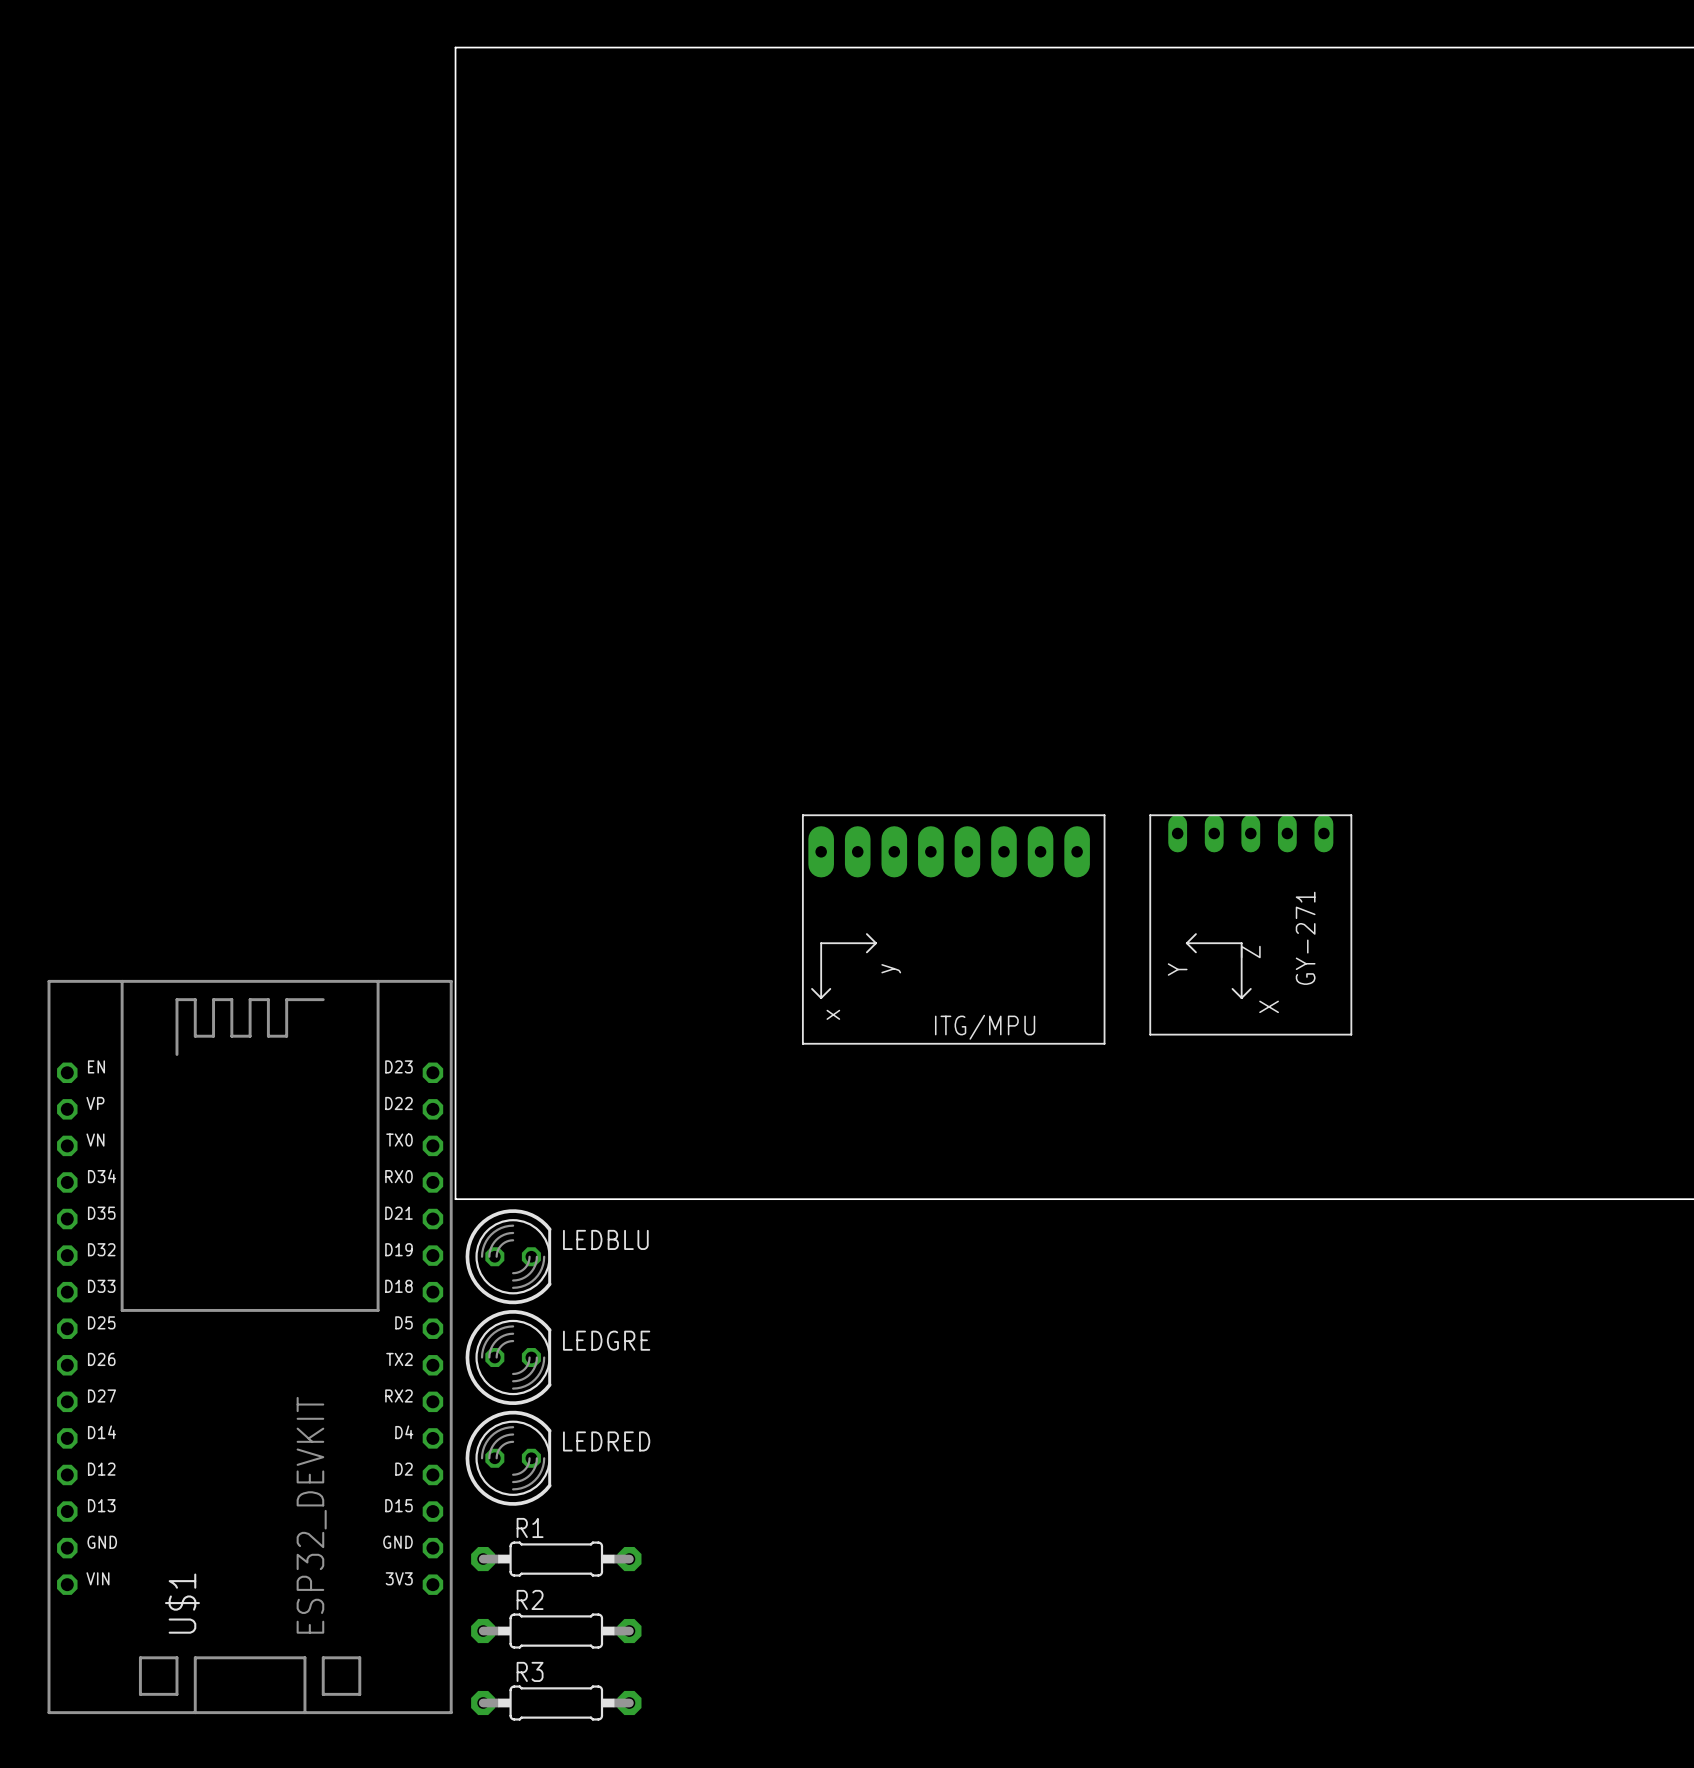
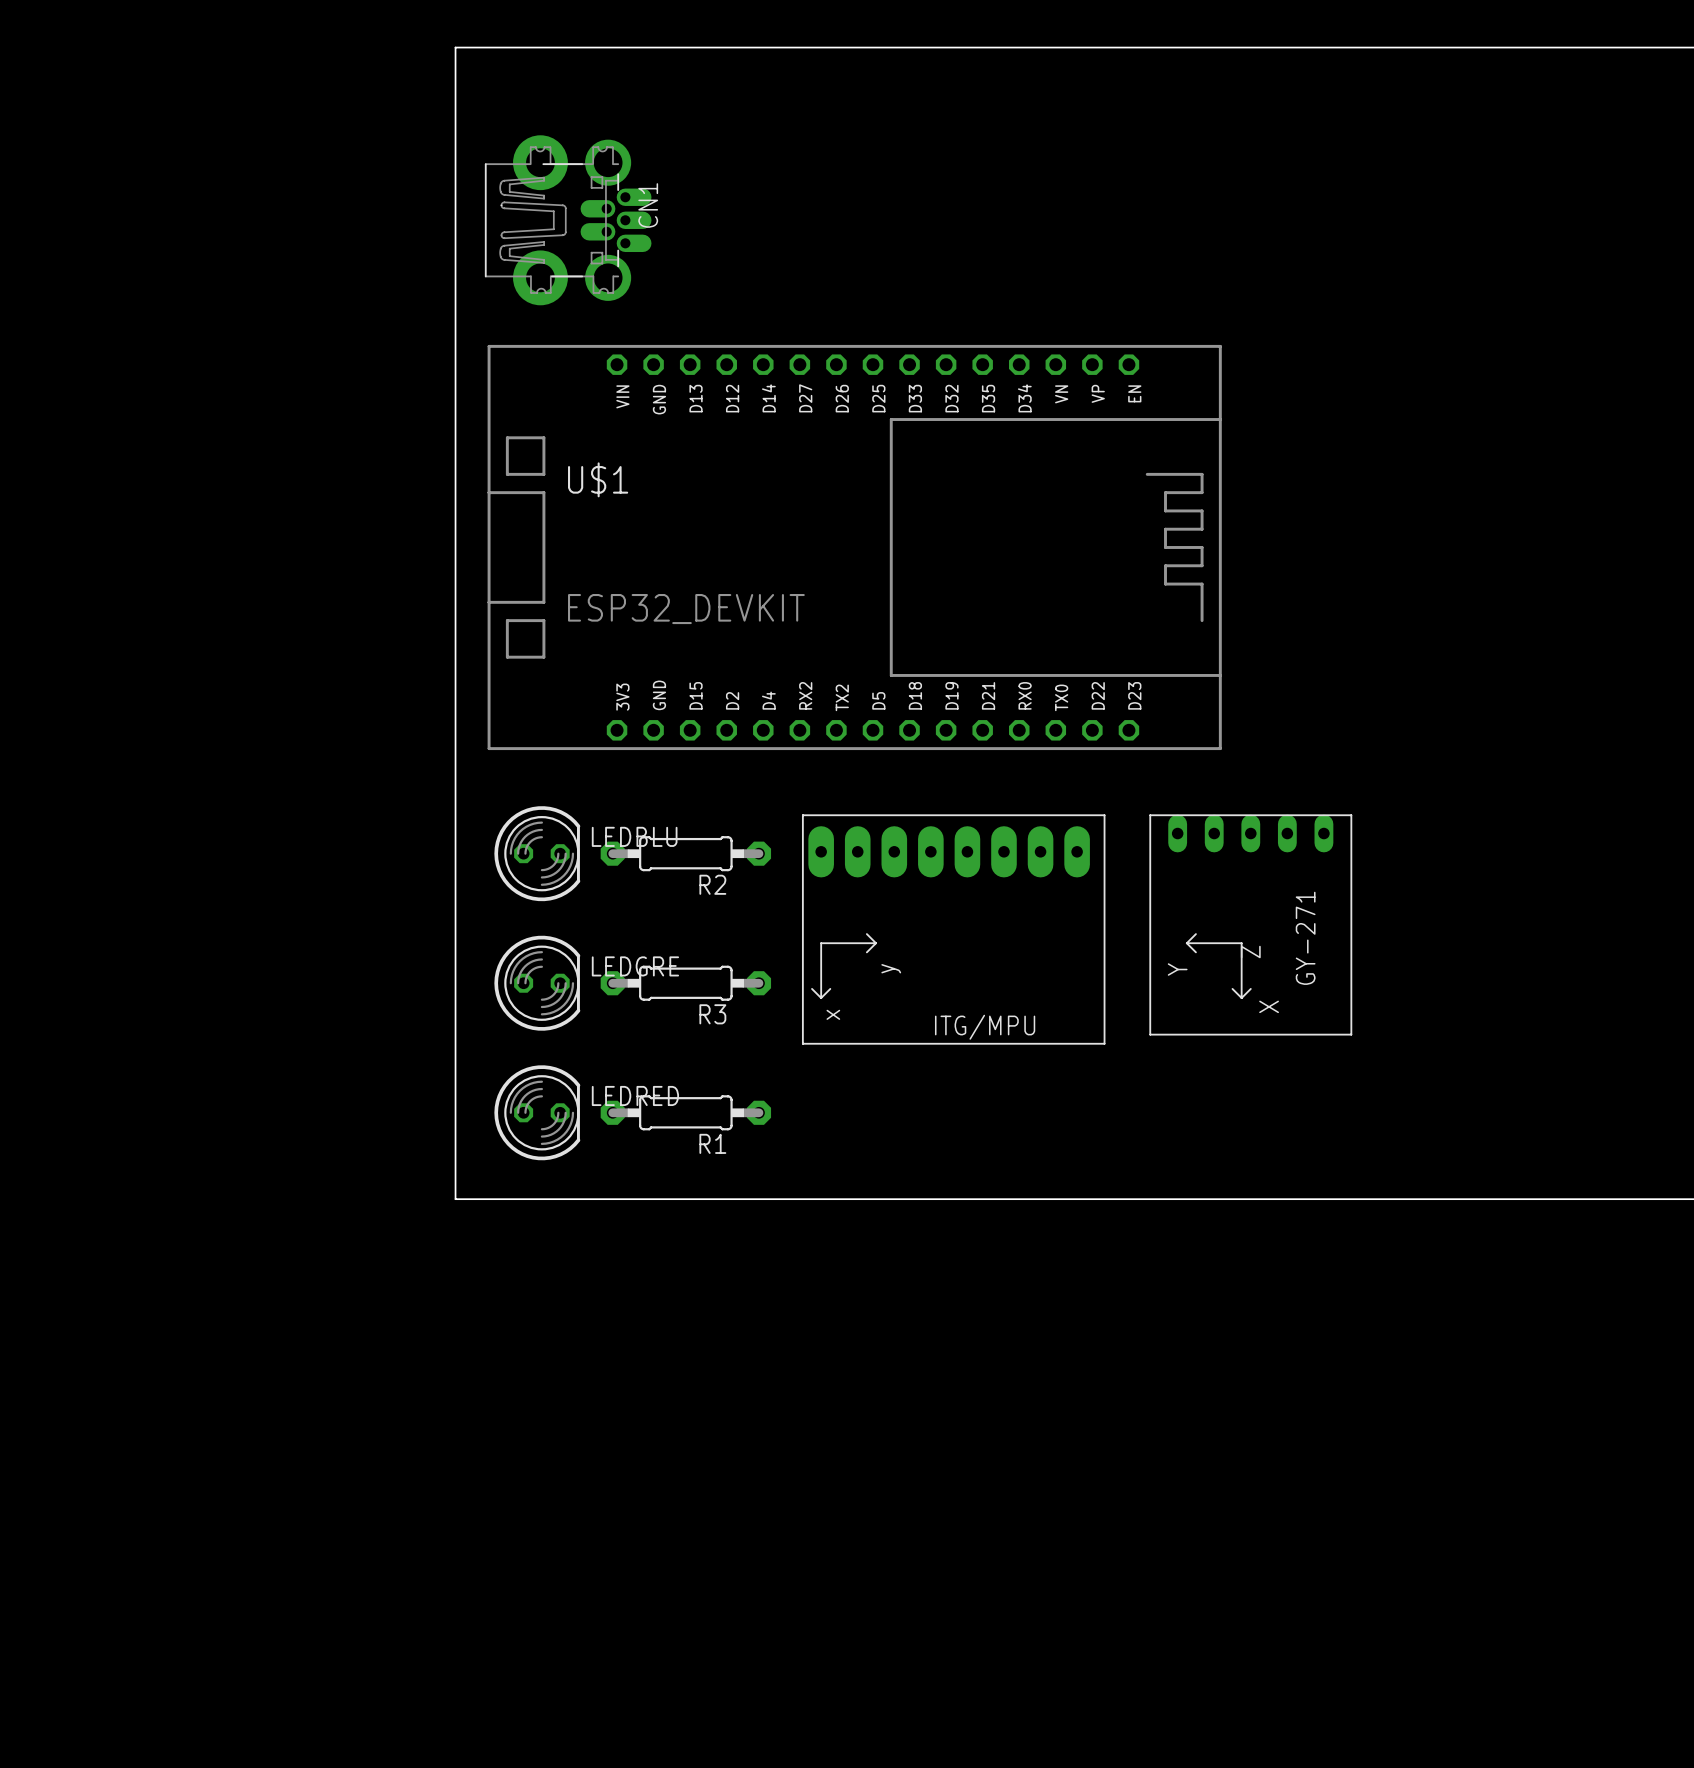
CN1: none -> (568, 220)
LEDBLU: none -> (537, 853)
U$1 footprint: [47, 979, 453, 1715] -> [487, 344, 1222, 751]
LEDGRE: none -> (537, 983)
LEDBLU: (508, 1256) -> none
LEDGRE: (508, 1357) -> none
LEDRED position: (508, 1458) -> (537, 1112)
U$1 value position: ESP32_DEVKIT (311, 1515) -> ESP32_DEVKIT (686, 609)
R1 name position: R1 (530, 1527) -> R1 (712, 1143)
R1 position: (556, 1559) -> (685, 1112)
R2 name position: R2 (530, 1599) -> R2 (712, 884)
U$1 name position: U$1 (182, 1603) -> U$1 (598, 479)
R2 position: (556, 1631) -> (685, 853)
R3 name position: R3 (530, 1671) -> R3 (712, 1014)
R3 position: (556, 1702) -> (685, 983)

